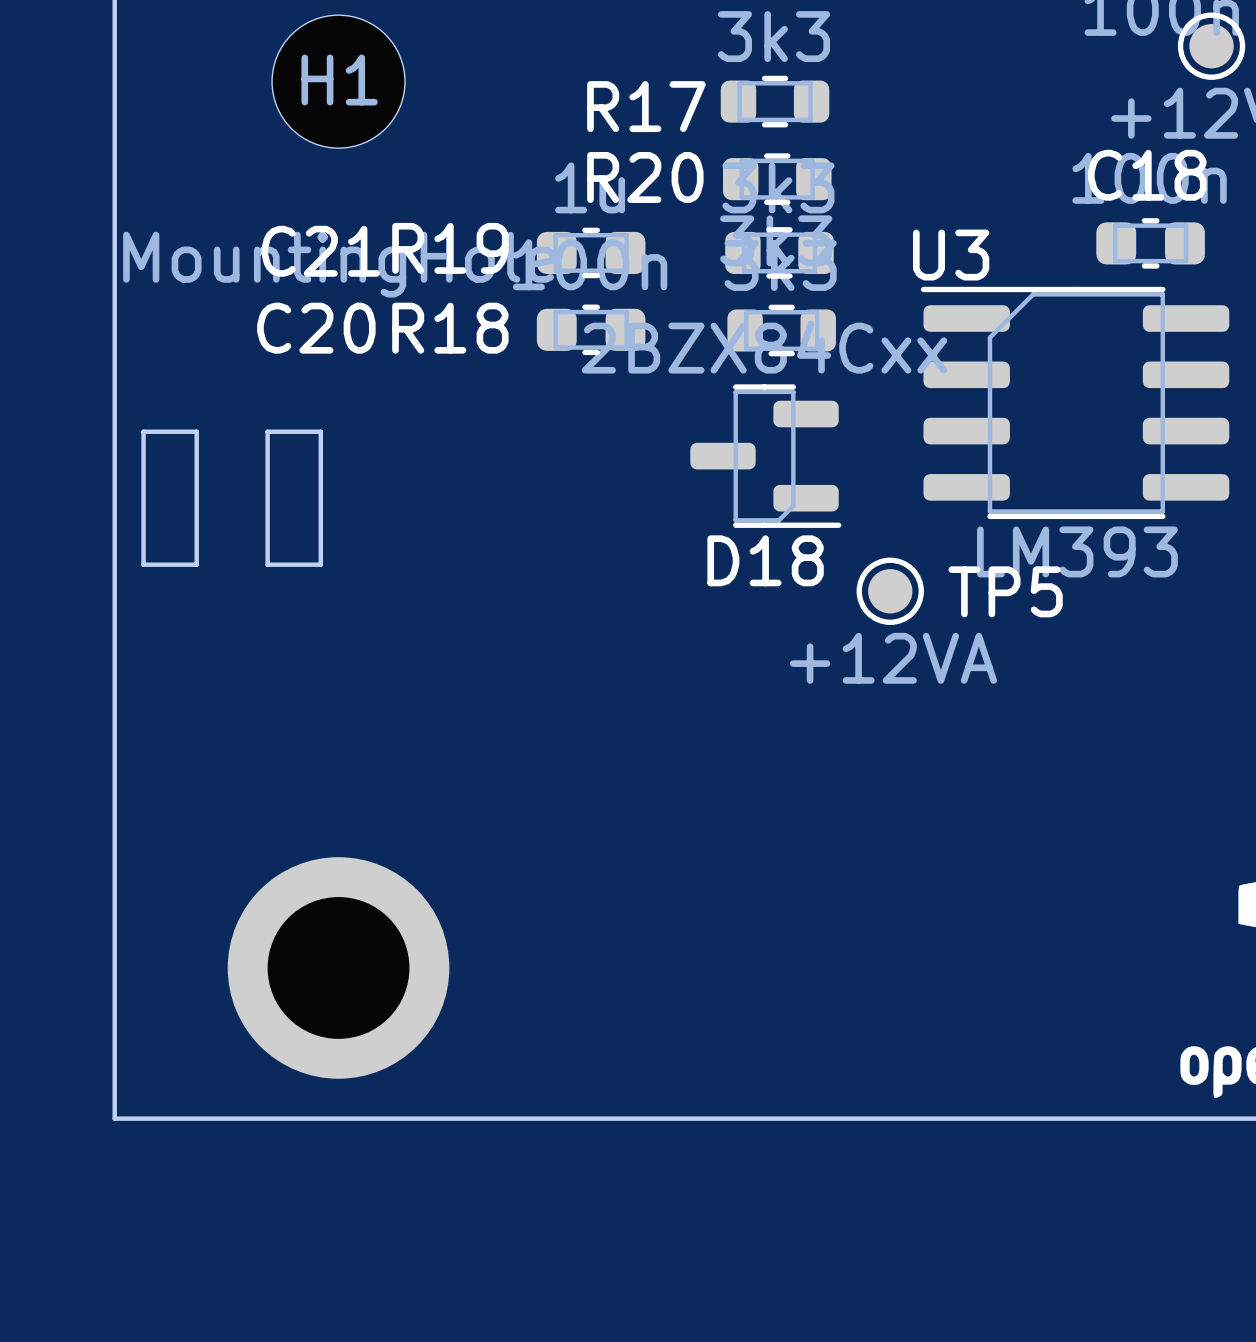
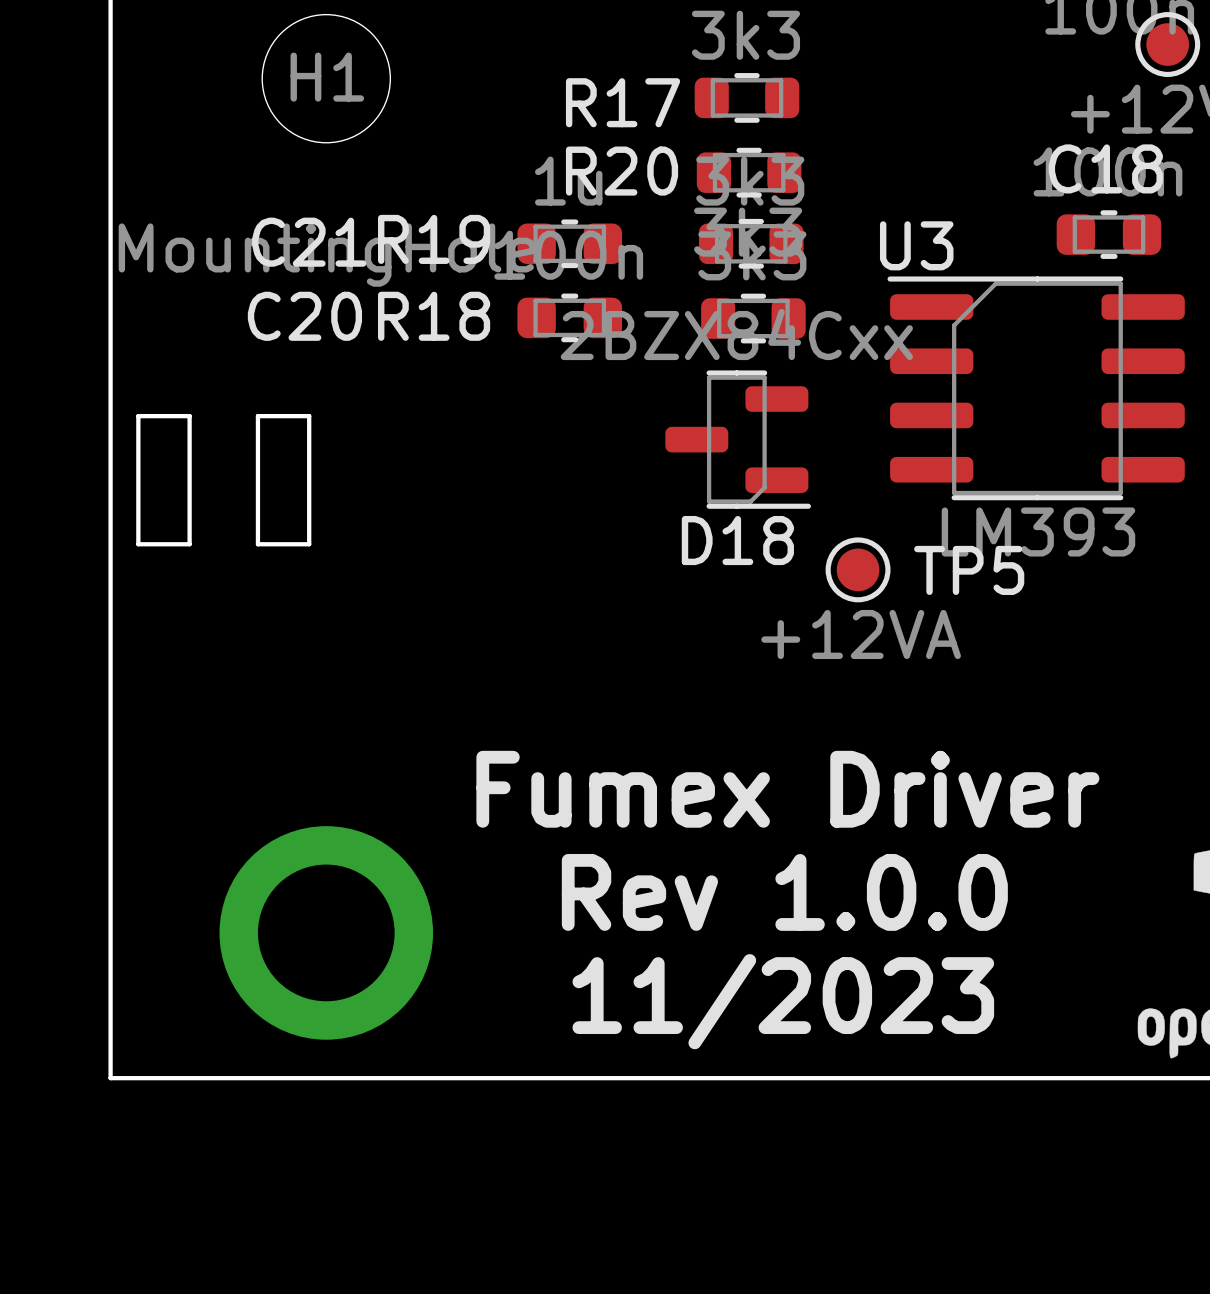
text: none -> Fumex Driver (787, 789)
text: none -> Rev 1.0.0 (784, 892)
text: none -> 11/2023 (783, 1001)

